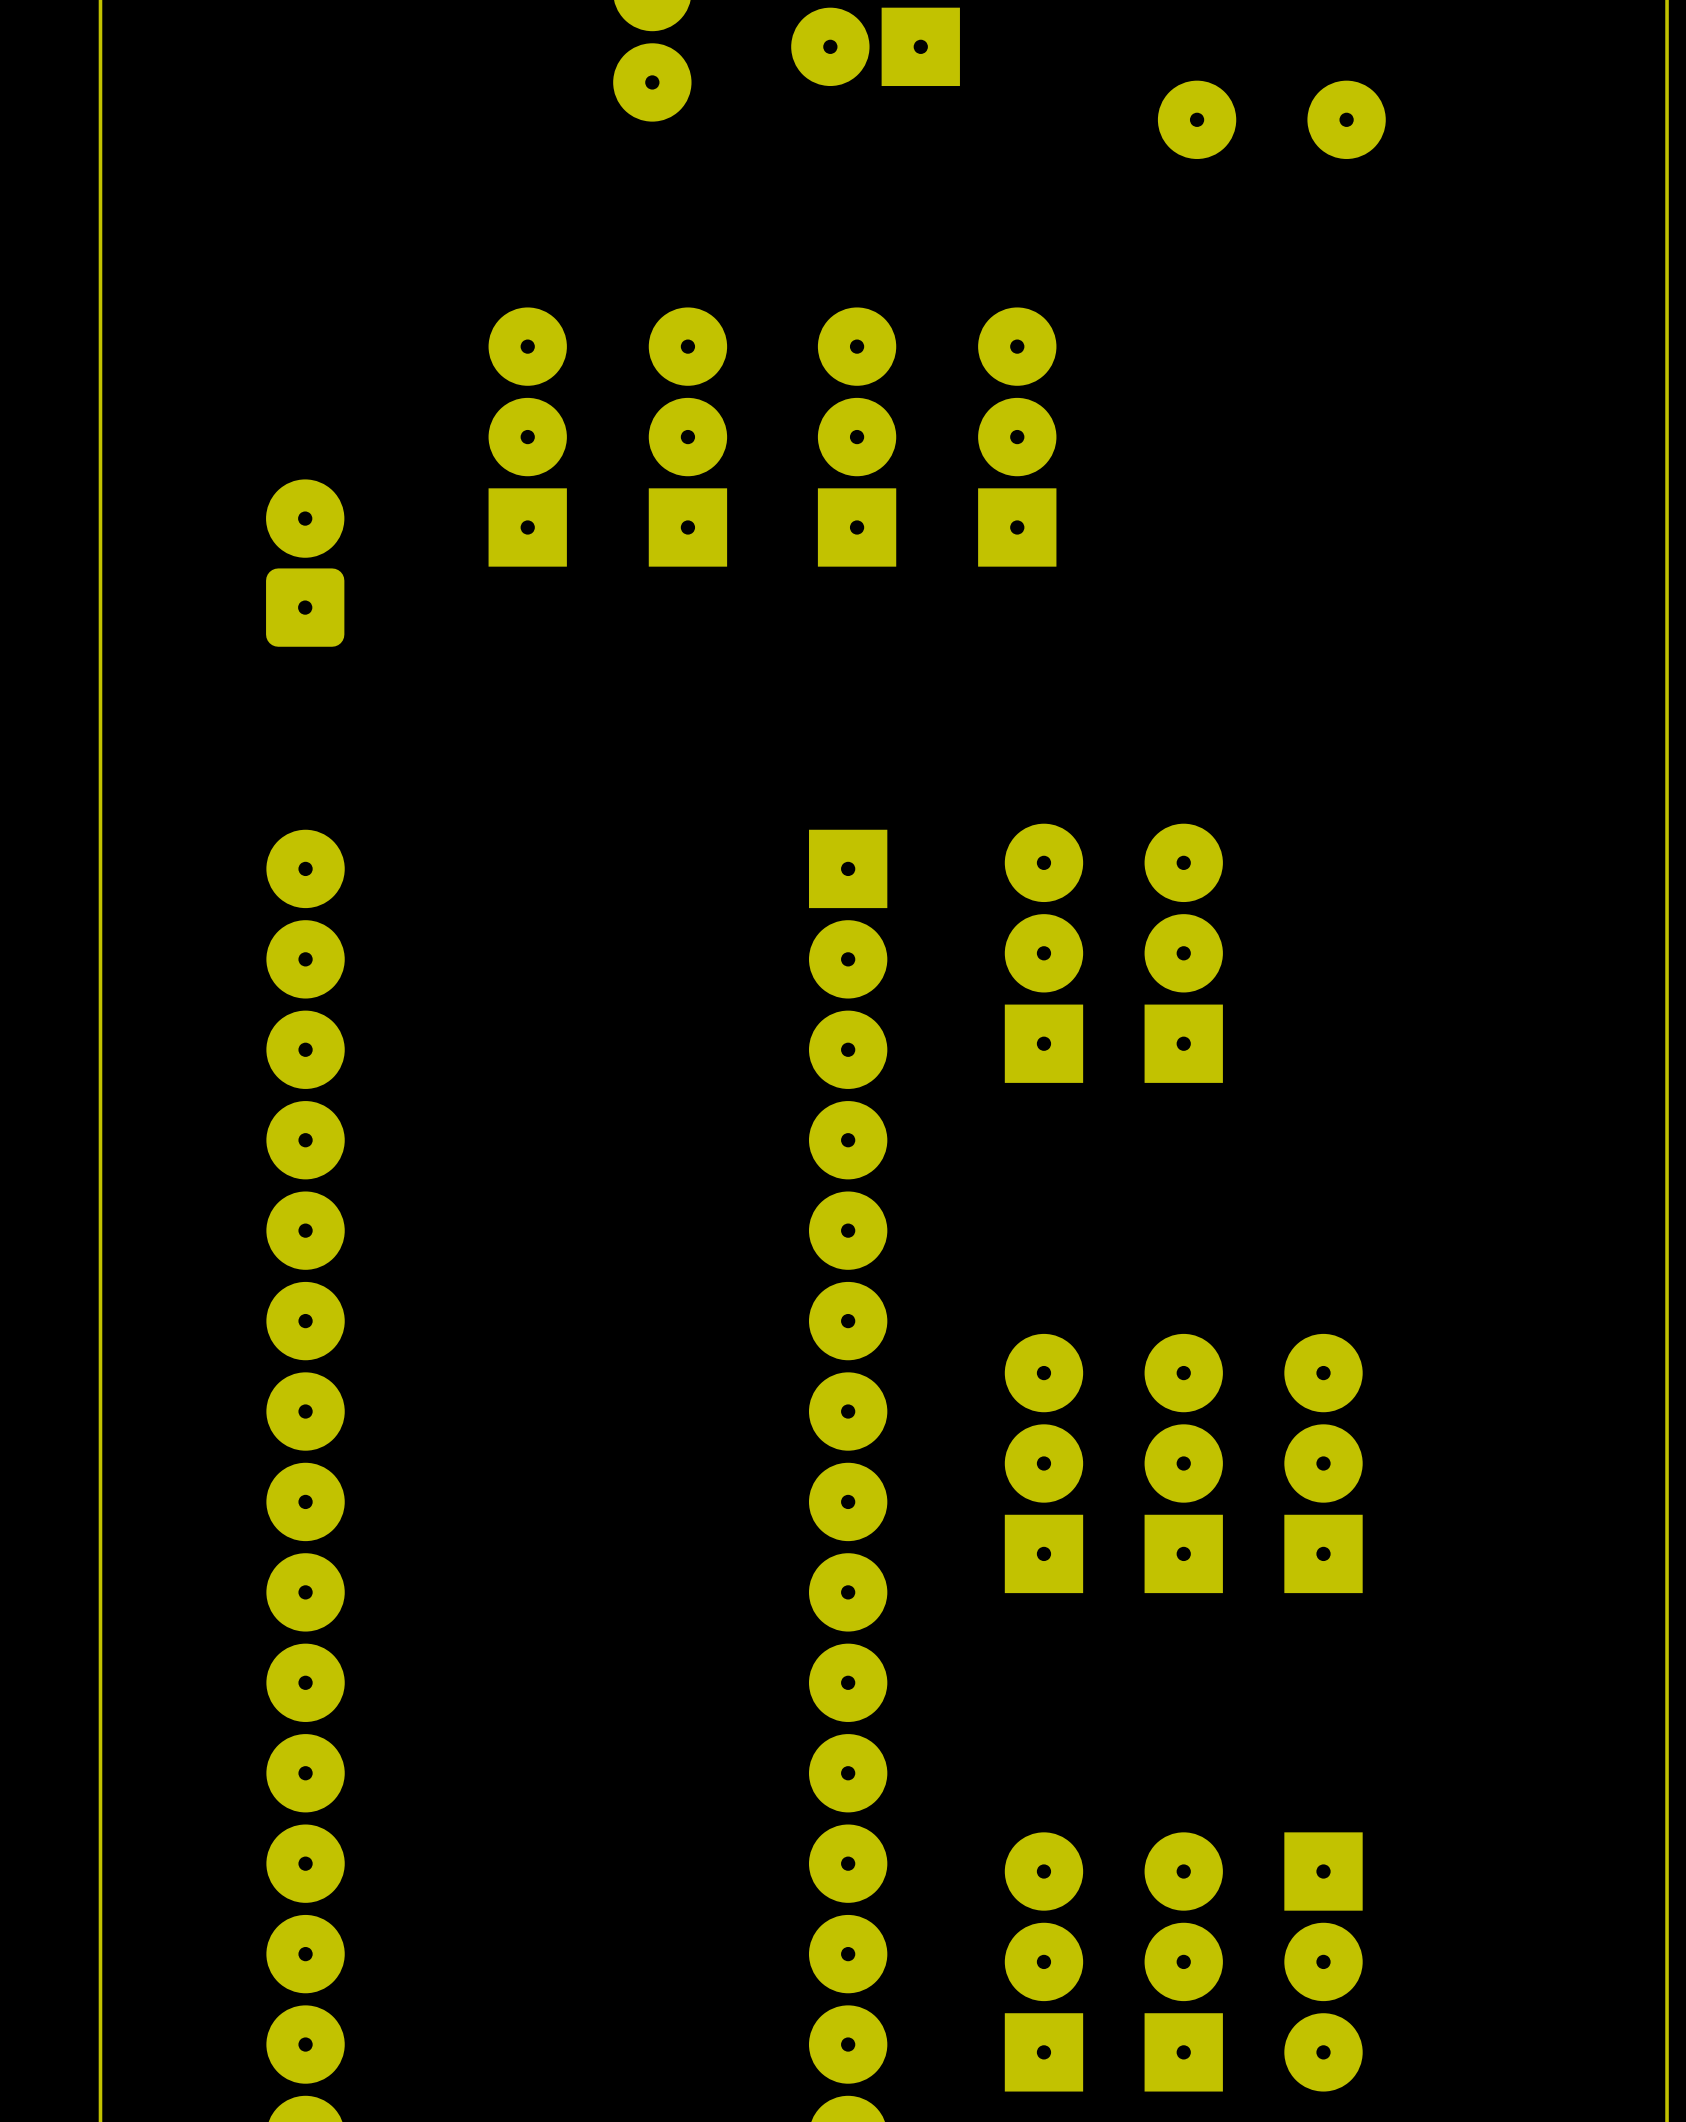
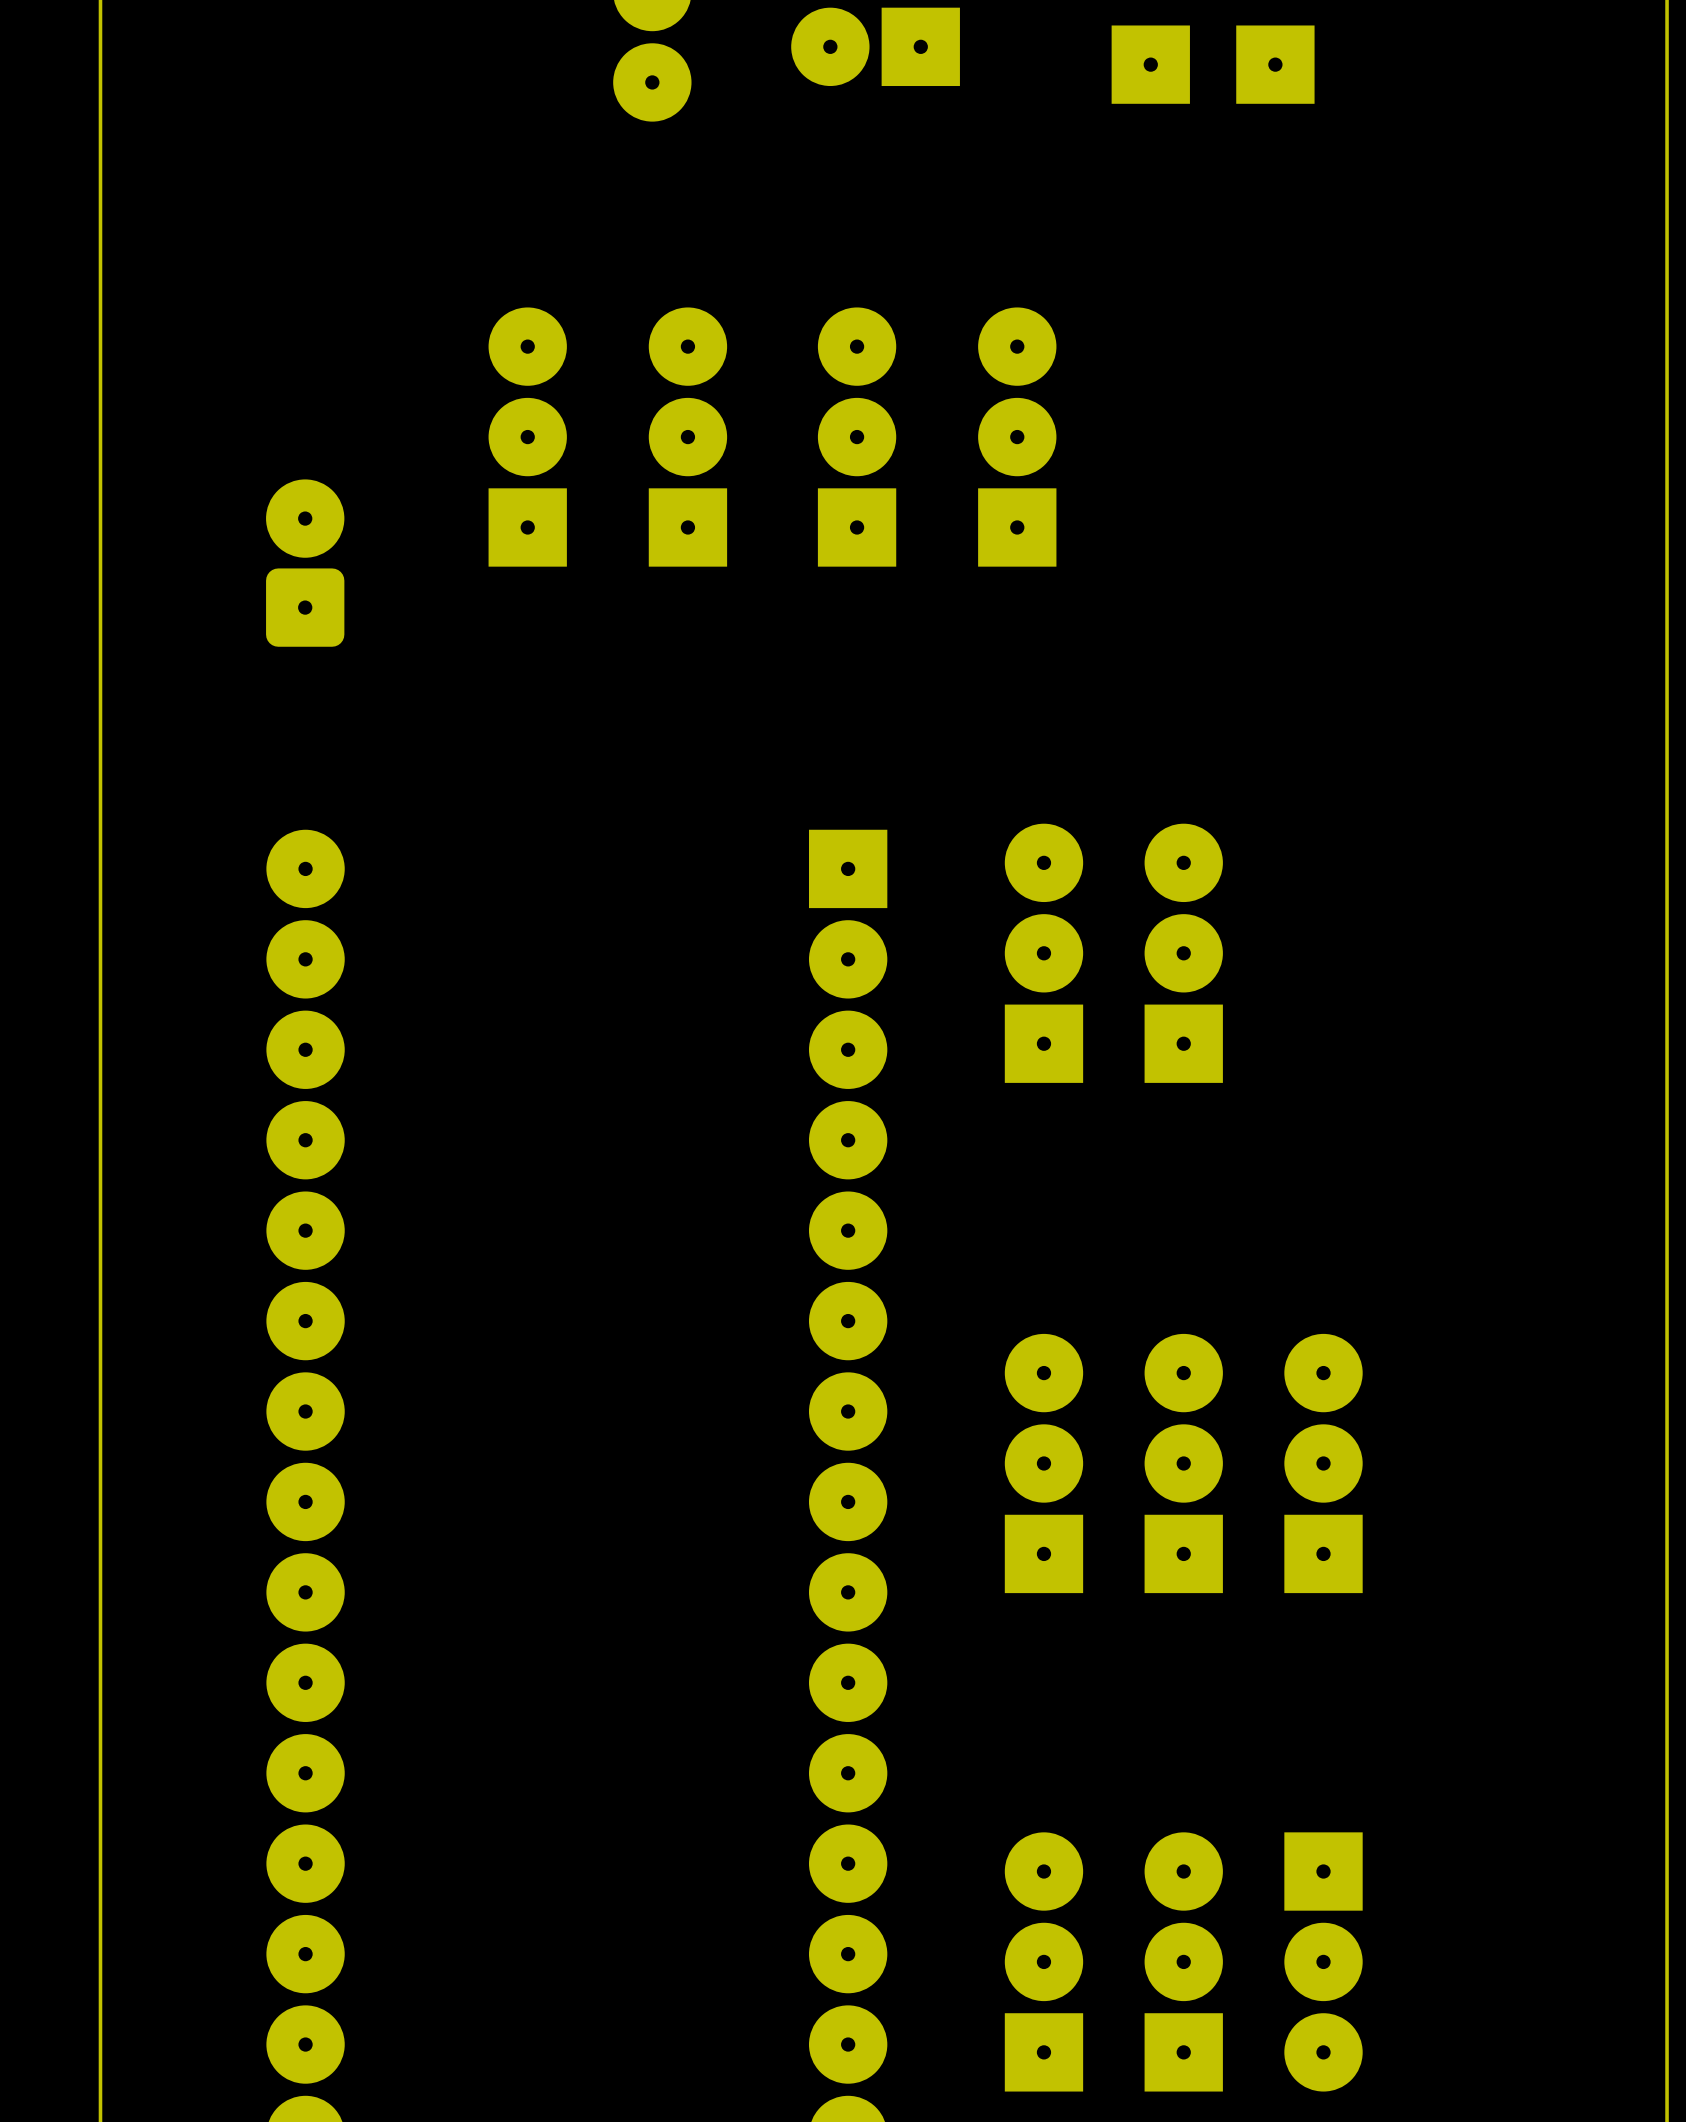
part: none -> (1150, 64)
part: none -> (1275, 64)
part: (1197, 119) -> none
part: (1346, 119) -> none

